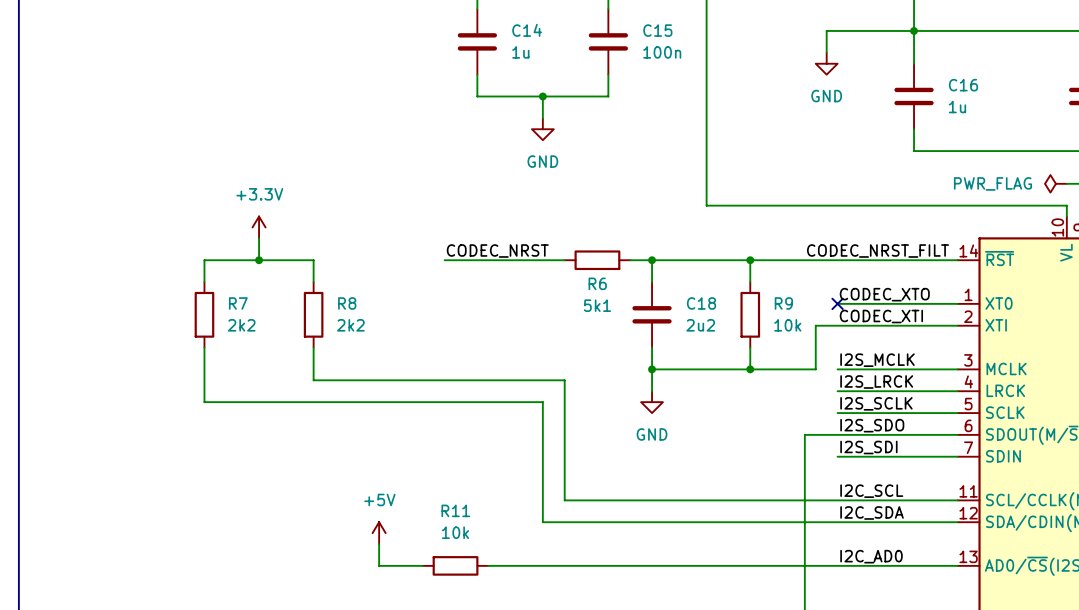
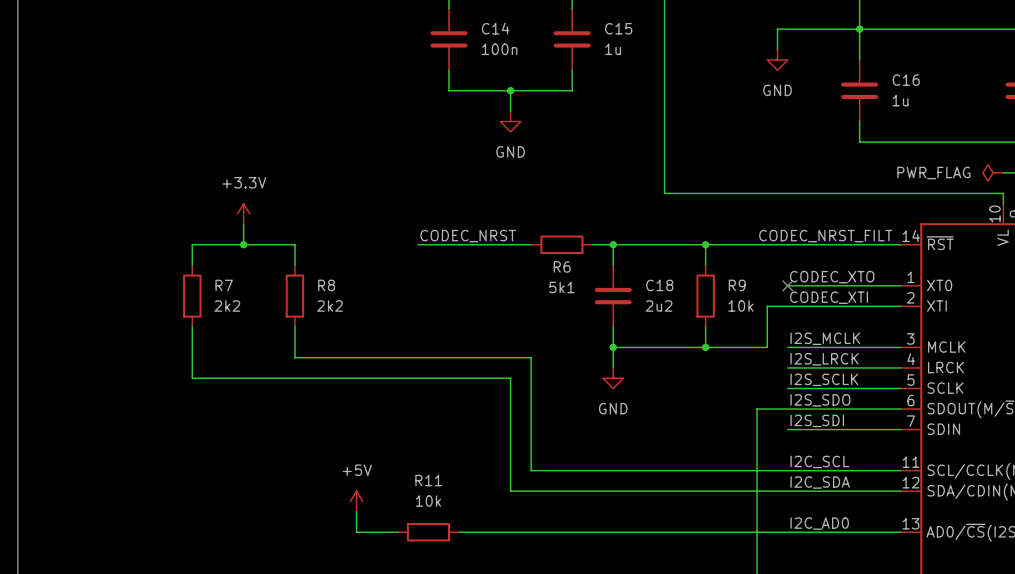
C14 value: 1u (520, 52) -> 100n (499, 49)
C15 value: 100n (662, 52) -> 1u (613, 49)

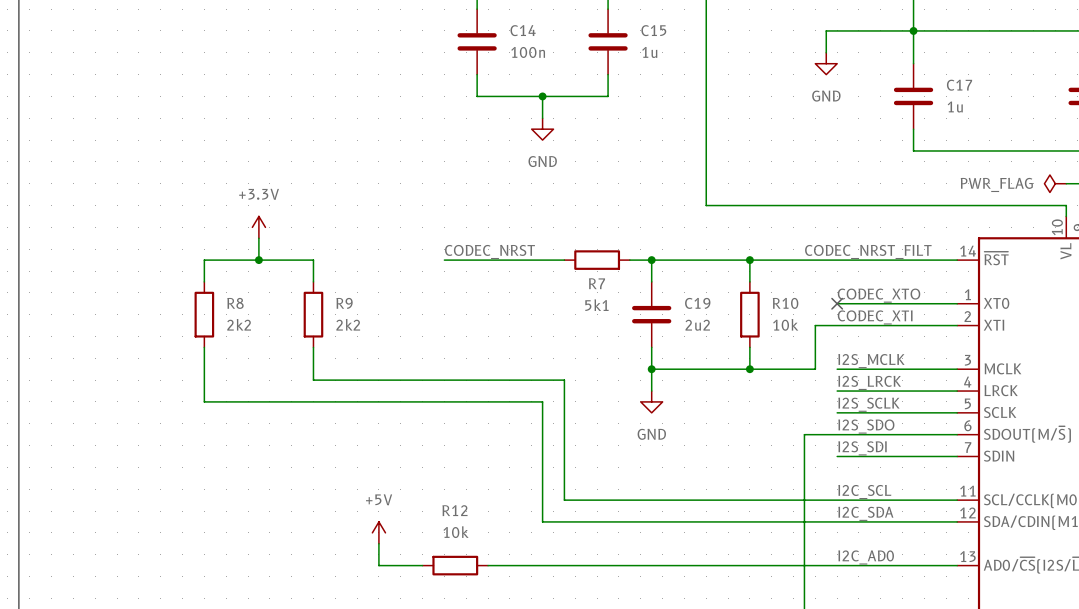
C16 name: C16 (906, 80) -> C17 (959, 85)
R6 name: R6 (562, 266) -> R7 (596, 283)
R7 name: R7 (224, 285) -> R8 (235, 303)
R8 name: R8 (326, 285) -> R9 (344, 303)
C18 name: C18 (659, 285) -> C19 (697, 303)
R9 name: R9 (737, 285) -> R10 (785, 303)
R11 name: R11 (428, 480) -> R12 (454, 510)

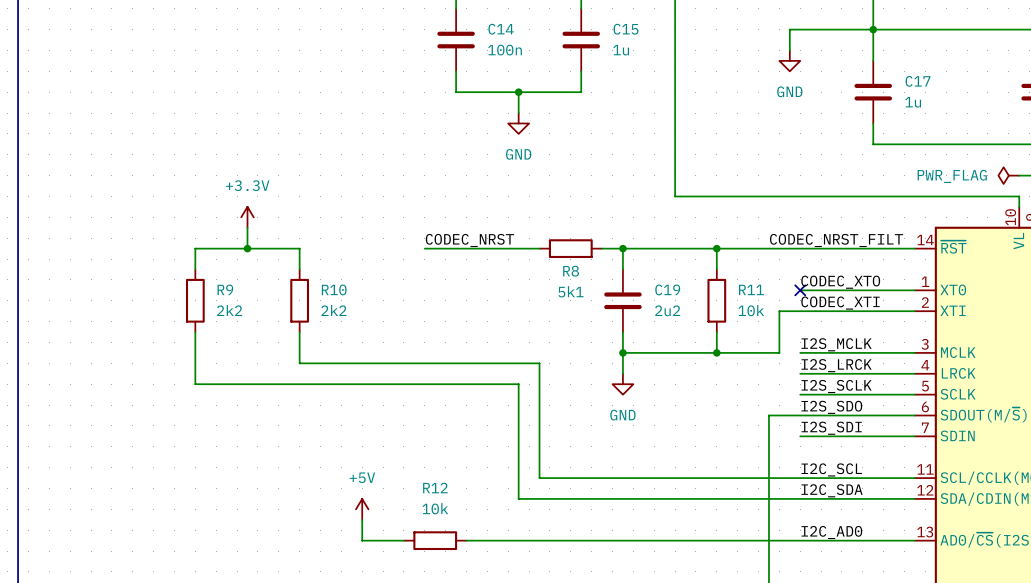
R7 name: R7 (596, 283) -> R8 (571, 271)
R8 name: R8 (235, 303) -> R9 (225, 289)
R9 name: R9 (344, 303) -> R10 (334, 289)
R10 name: R10 (785, 303) -> R11 (751, 289)

